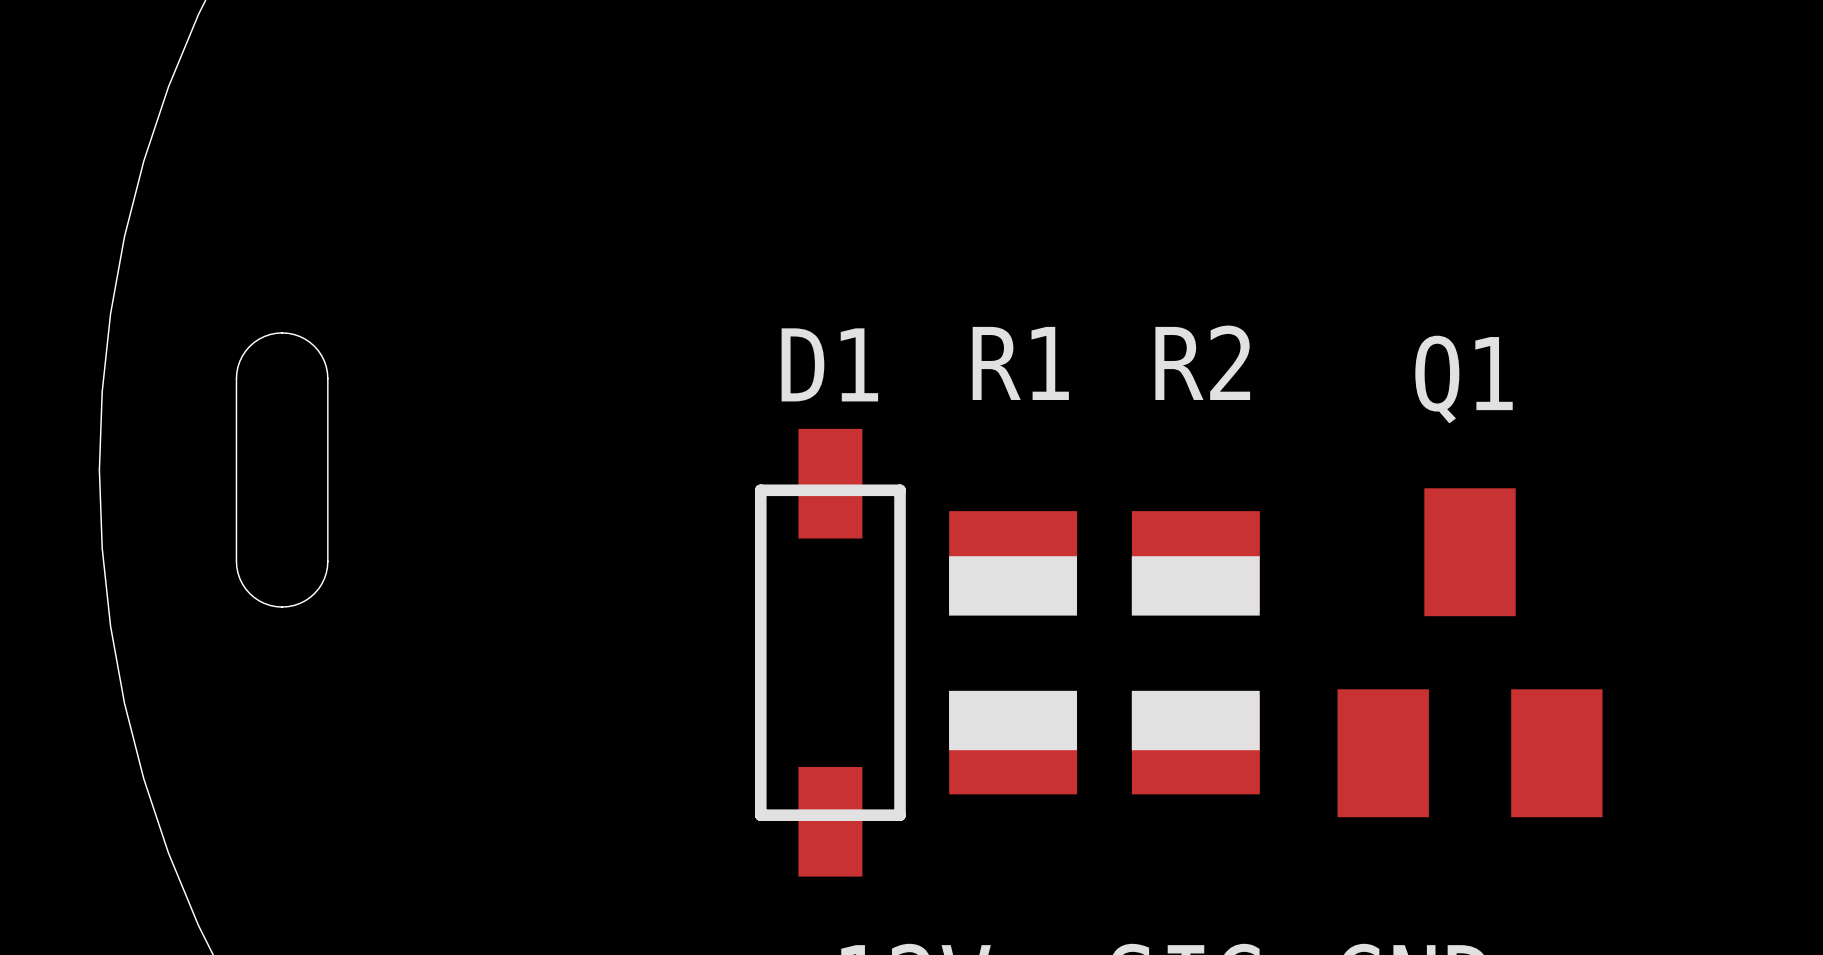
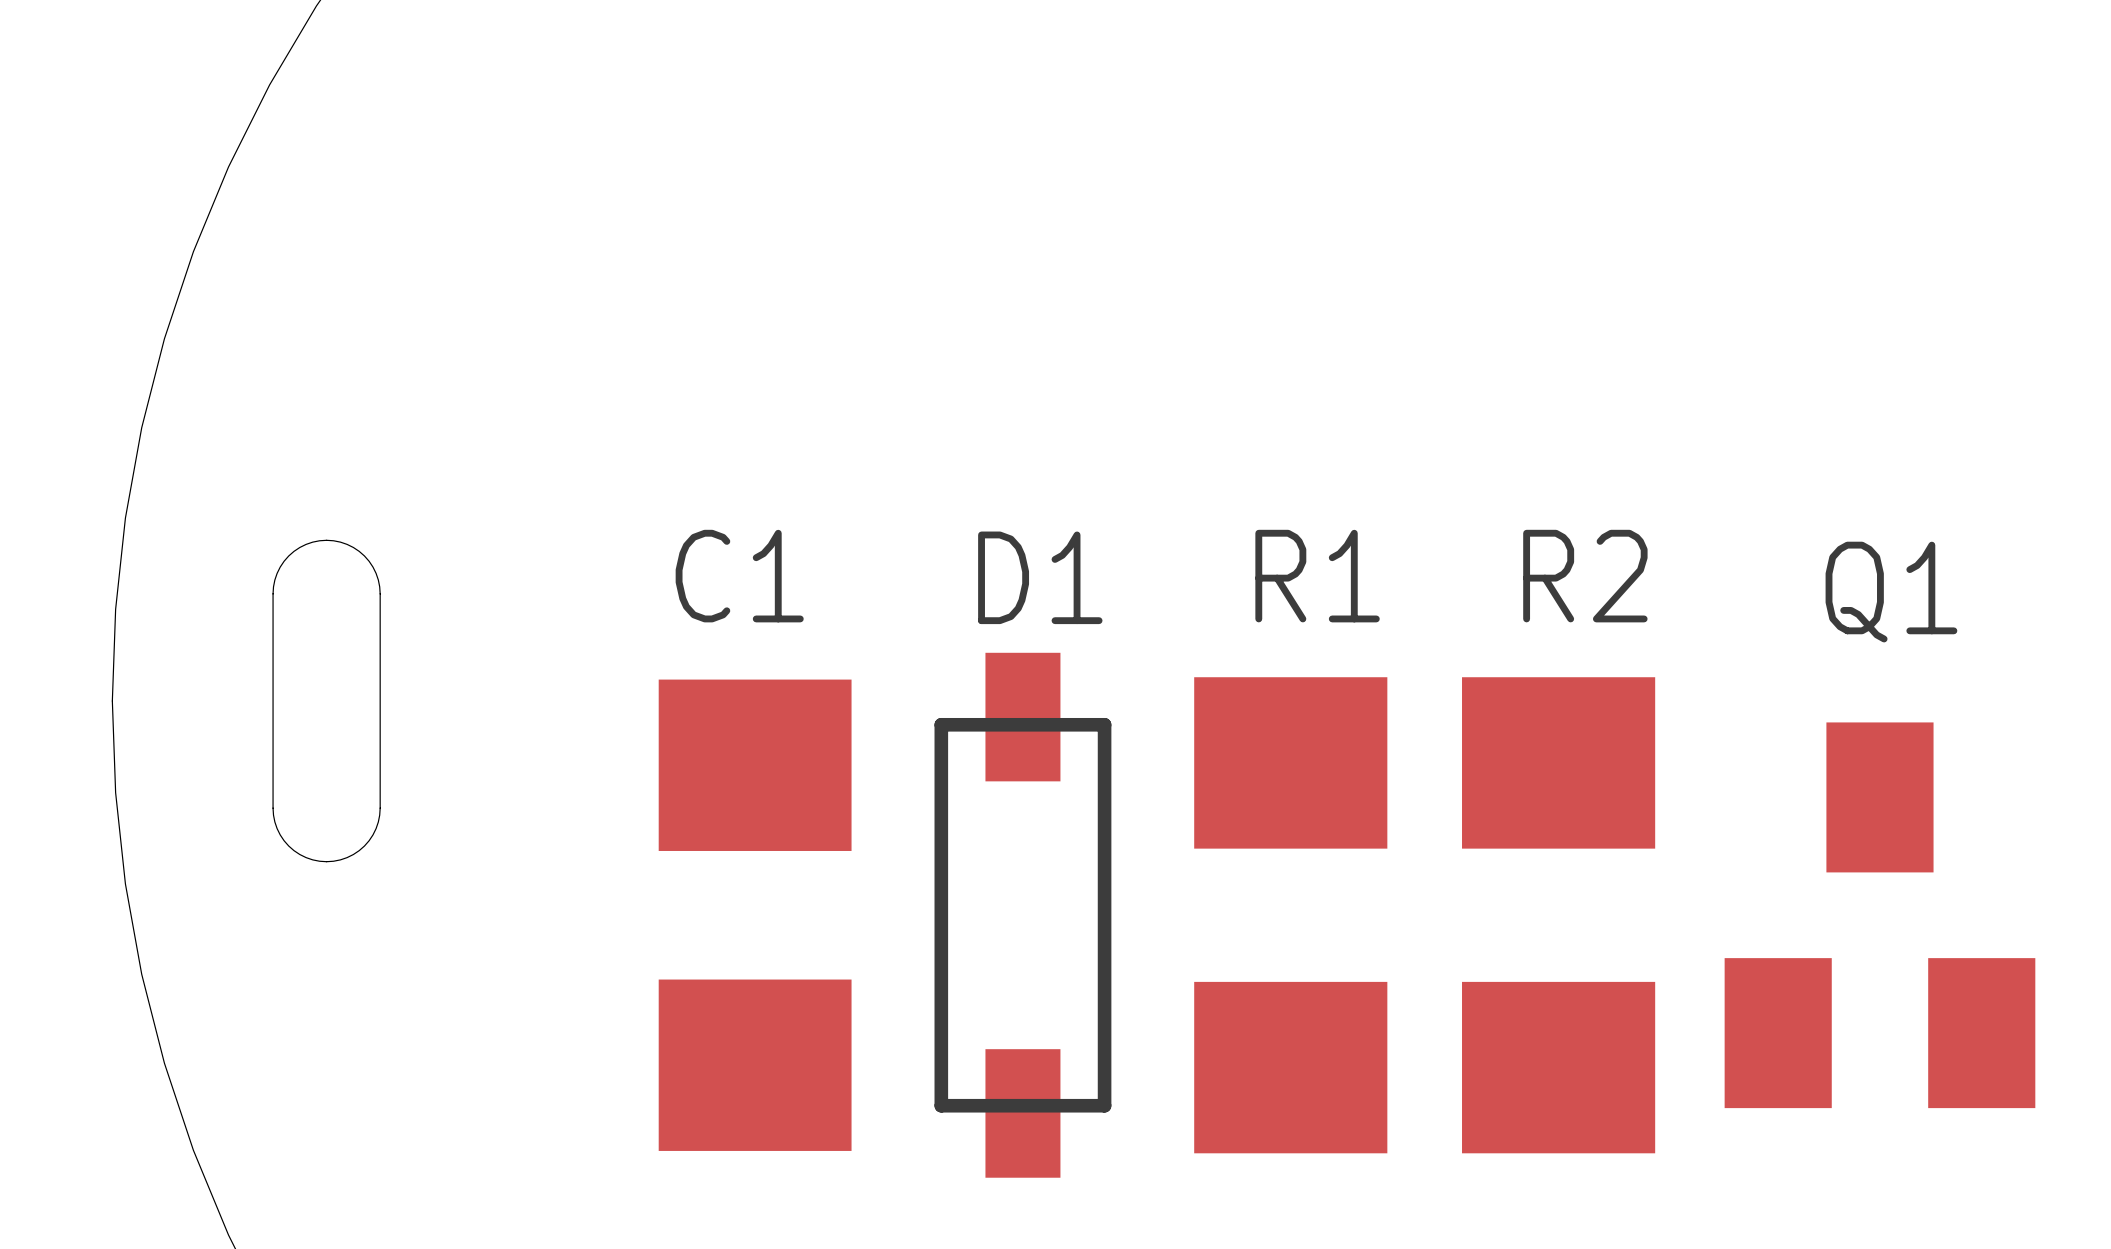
R1 footprint: [949, 511, 1078, 795] -> [1194, 677, 1388, 1154]
R2 footprint: [1131, 511, 1260, 795] -> [1462, 677, 1656, 1154]
C1: none -> (755, 915)
D1 position: (830, 652) -> (1022, 915)
Q1 position: (1470, 652) -> (1879, 915)

